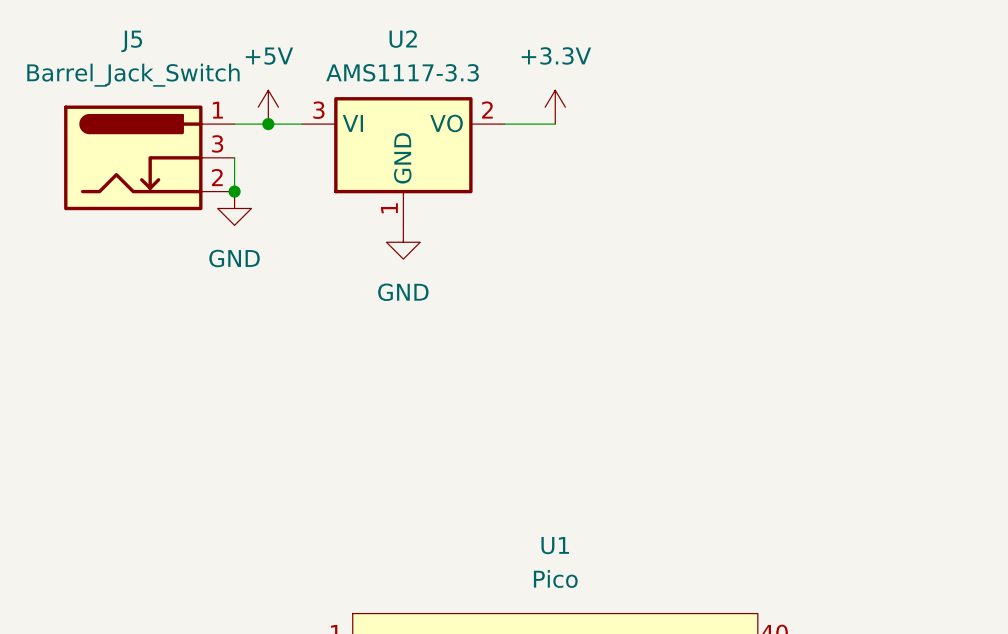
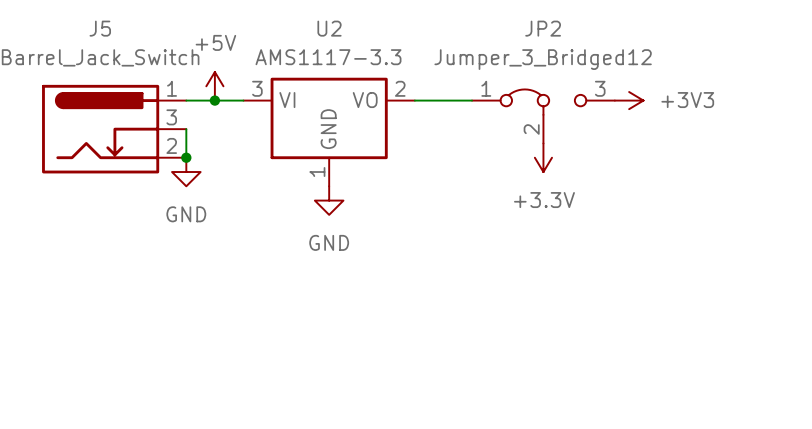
power symbol rotation: 0° (555, 107) -> 180° (543, 157)
power symbol position: +3.3V (555, 107) -> +3.3V (543, 157)
wire: none -> (457, 100) (472, 100)
power symbol: none -> +3V3 (629, 100)
JP2: none -> Jumper_3_Bridged12 (543, 116)

